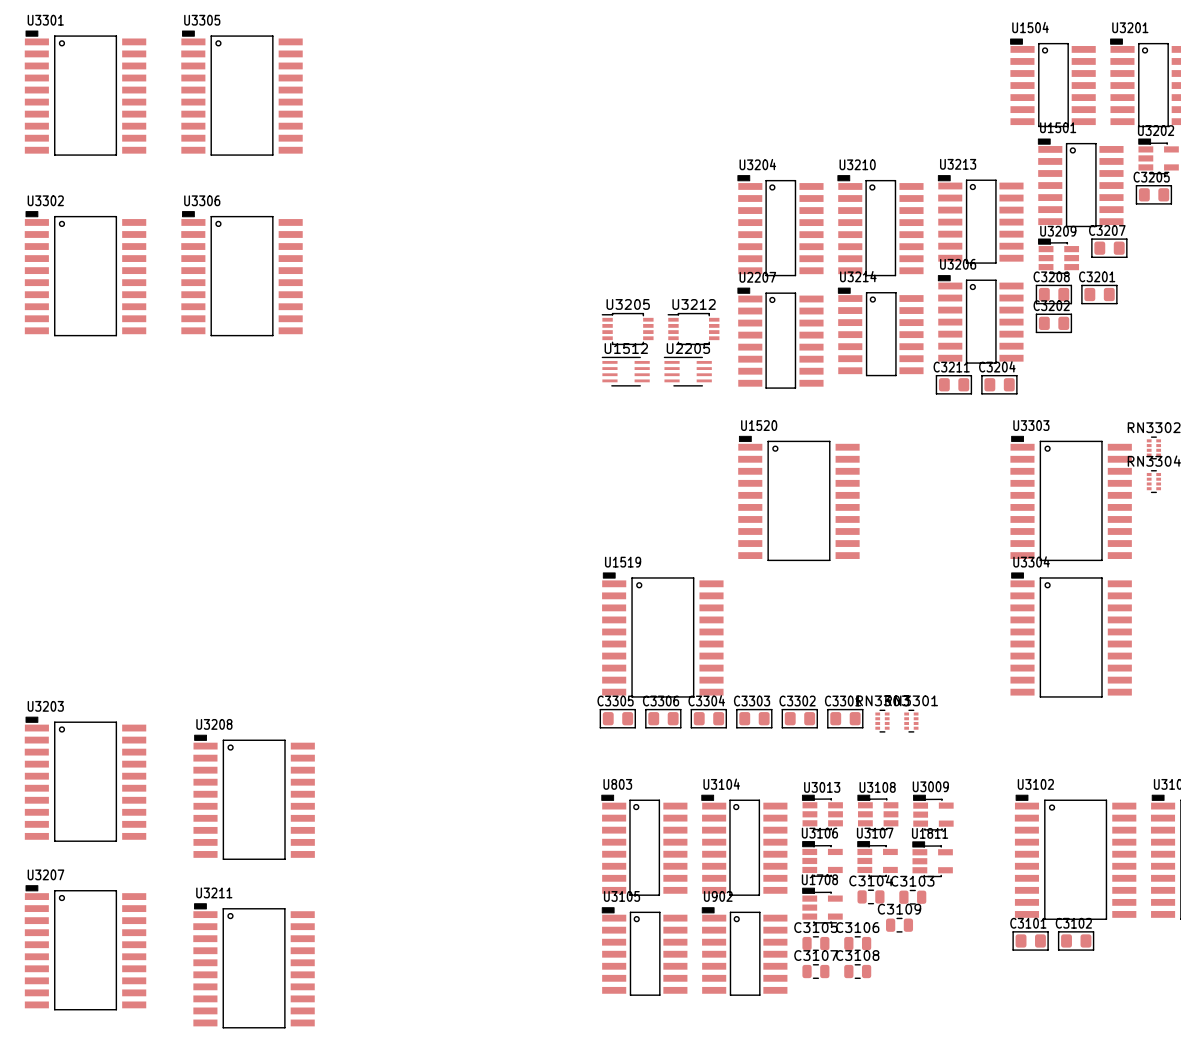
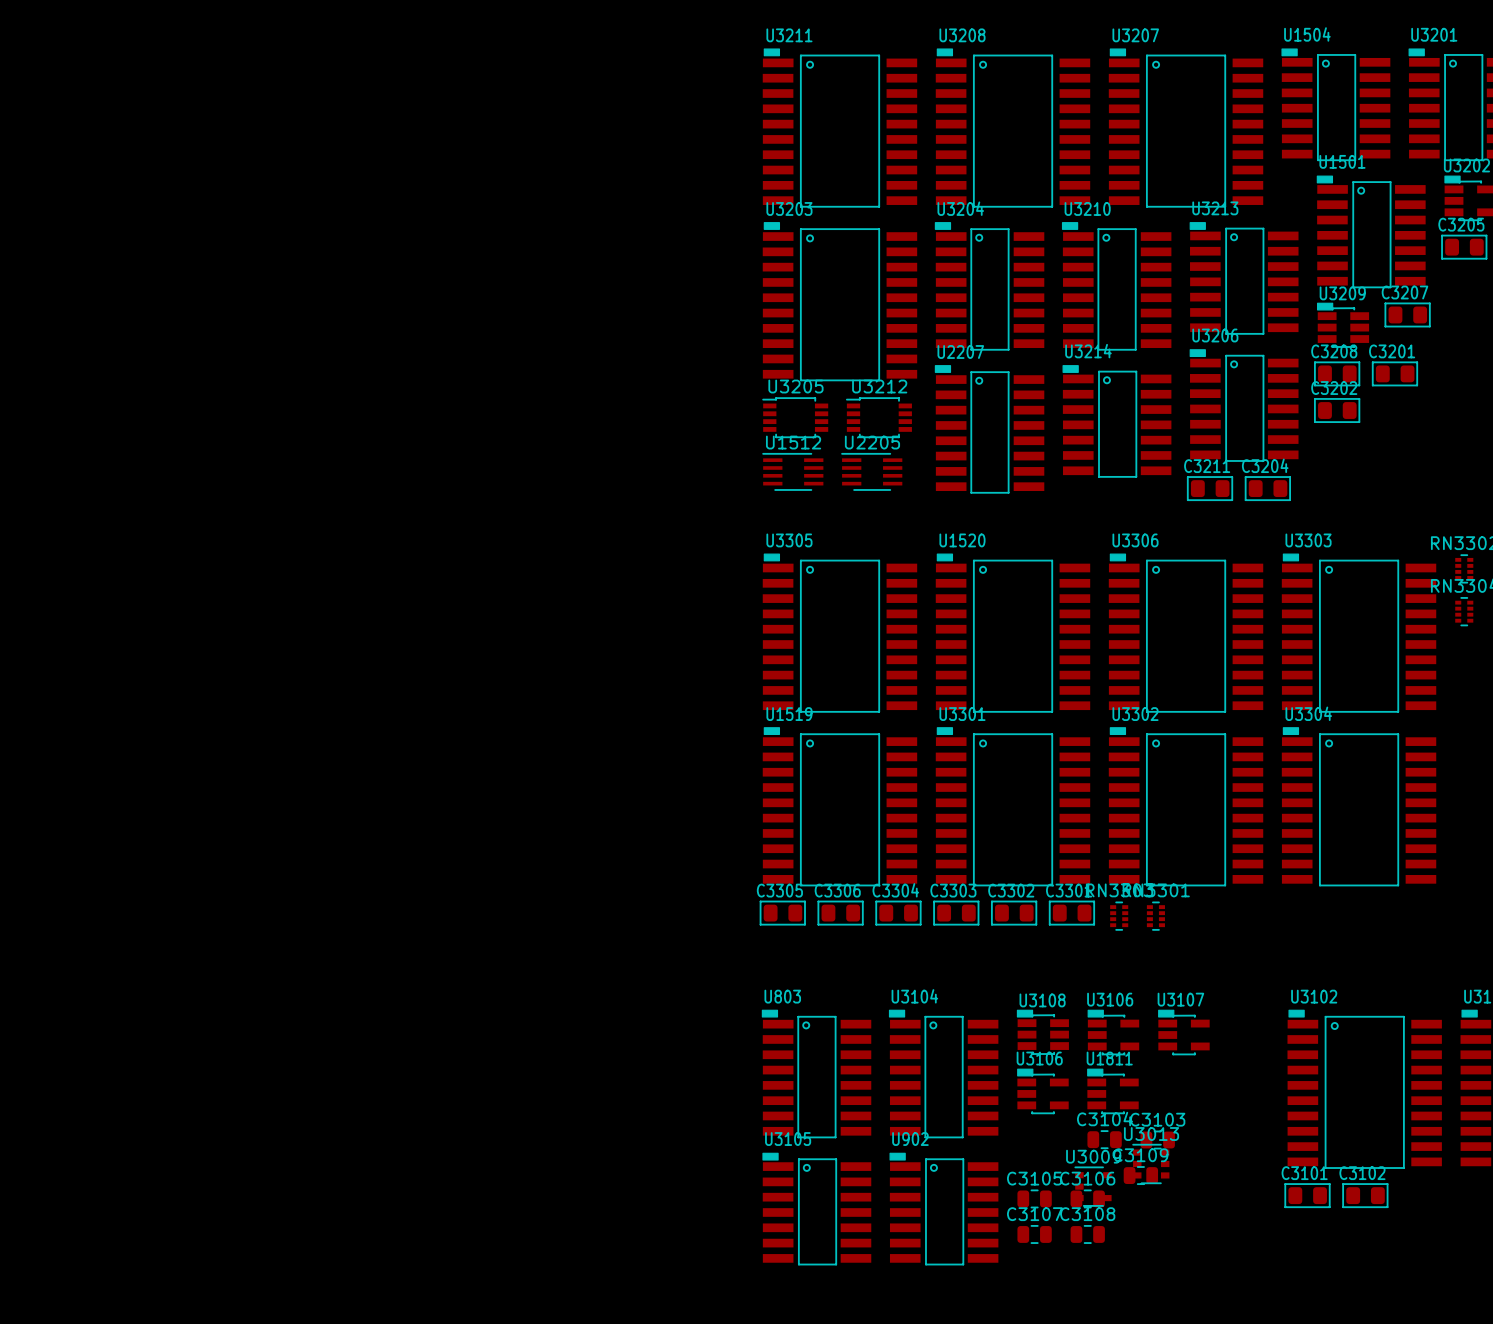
U3301 position: (85, 93) -> (1012, 806)
U3305 position: (241, 93) -> (839, 633)
U3302 position: (85, 273) -> (1186, 806)
U3306 position: (241, 273) -> (1186, 633)
U3203 position: (85, 779) -> (839, 301)
U3009 name: U3009 (930, 786) -> U3107 (1180, 999)
U3013 name: U3013 (822, 787) -> U3108 (1042, 1000)
U3208 position: (254, 797) -> (1012, 128)
U3108: (877, 812) -> none
U3106: none -> (1113, 1032)
U3107 name: U3107 (875, 833) -> U1811 (1109, 1058)
U1811: (932, 859) -> none
U1708: (822, 905) -> none
U3013: none -> (1150, 1163)
U3009: none -> (1093, 1186)
U3207 position: (85, 947) -> (1186, 128)
U3211 position: (254, 965) -> (839, 128)

